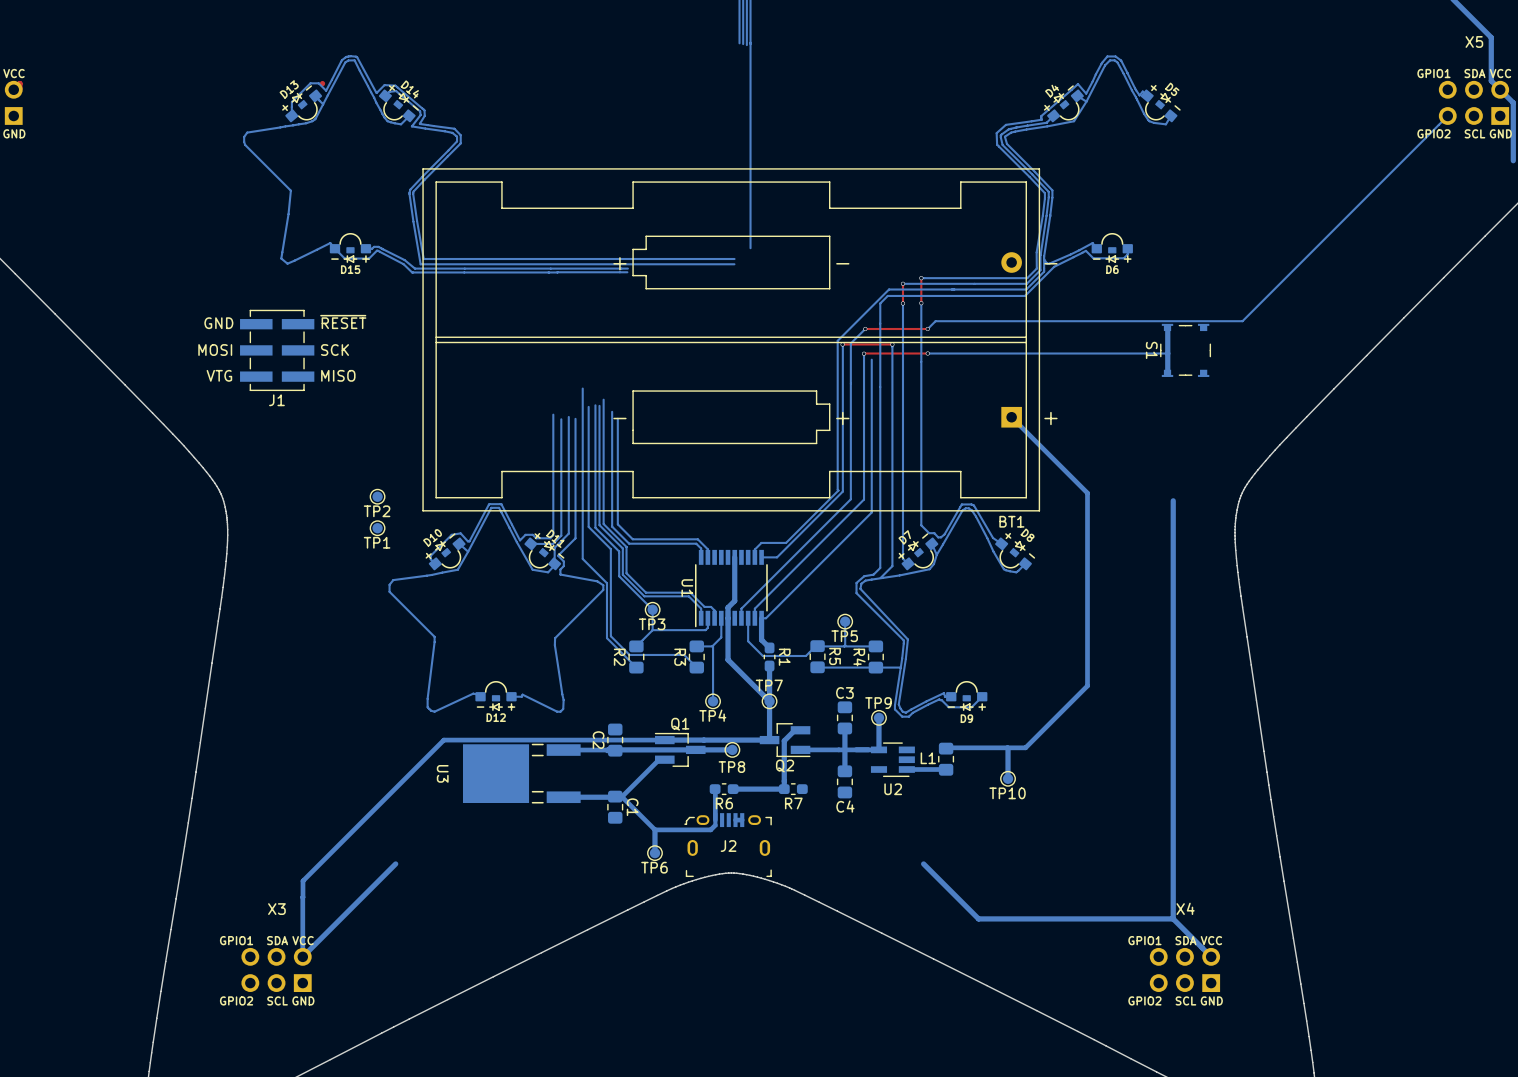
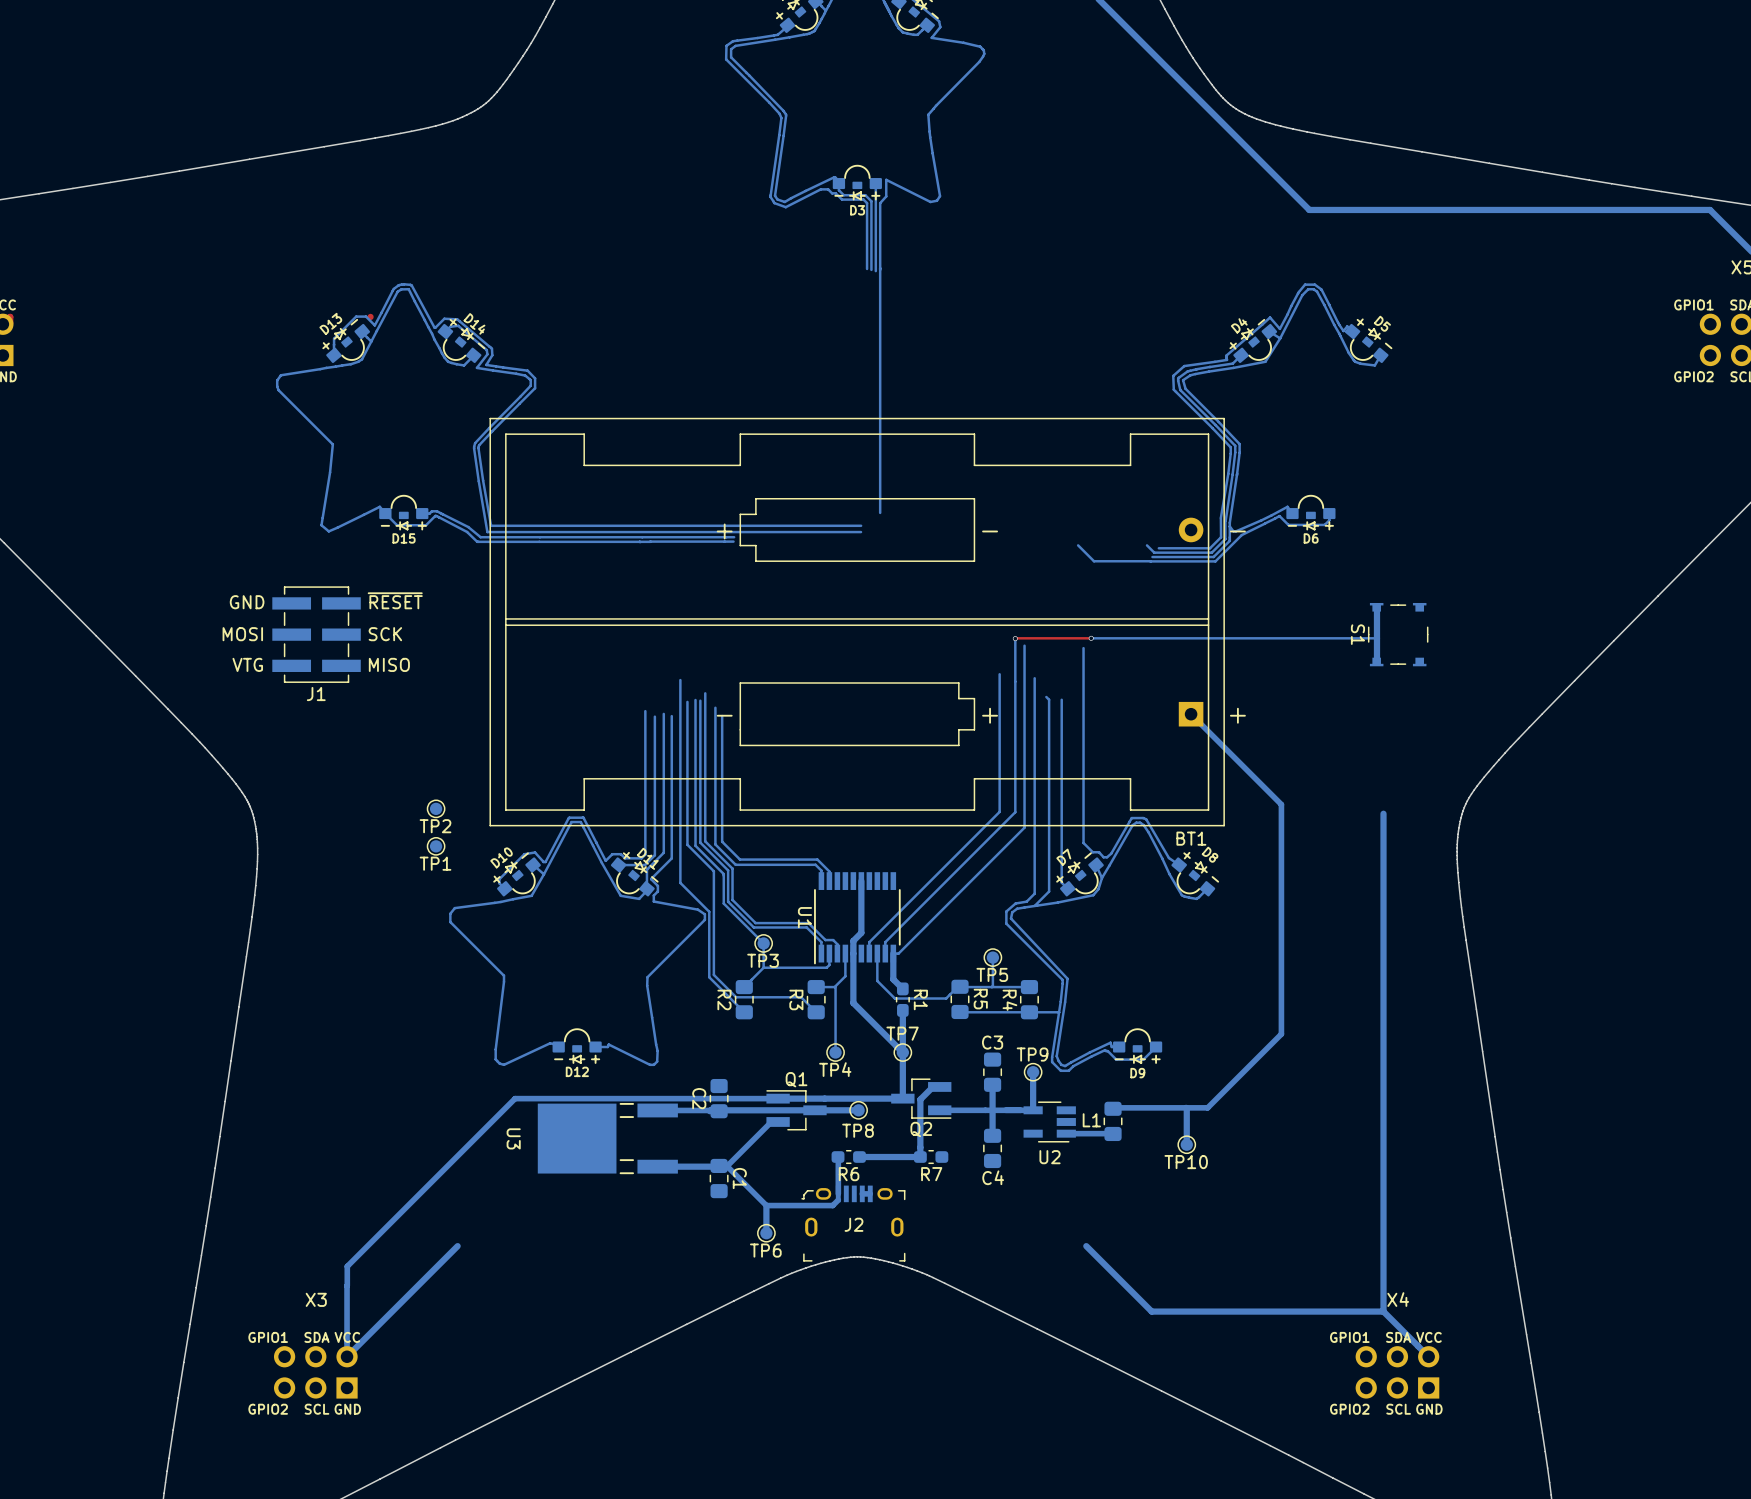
bottom track: (1447, 115) (1242, 321) (935, 321) (927, 328) -> none
bottom track: none -> (1078, 545) (1094, 561) (1150, 561)
bottom track: (1027, 277) (921, 277) -> (1210, 548) (1158, 548)
top track: (921, 278) (921, 303) -> none
via: (921, 278) -> none
bottom track: (1029, 281) (1026, 283) (902, 283) -> (1211, 552) (1154, 552) (1147, 545)
top track: (902, 283) (902, 303) -> none
via: (902, 283) -> none
bottom track: (1030, 285) (1026, 289) (889, 289) (837, 340) (838, 490) (786, 542) (761, 542) (754, 549) (754, 557) -> (1213, 557) (1152, 557)
bottom track: (1032, 288) (1025, 295) (887, 295) (880, 303) (880, 387) -> (1215, 561) (1150, 561)
bottom track: (902, 303) (902, 405) -> none
via: (902, 303) -> none
bottom track: (921, 303) (921, 361) -> none
via: (921, 303) -> none
bottom track: (865, 328) (850, 343) (850, 383) -> none
via: (865, 328) -> none
top track: (927, 328) (865, 328) -> none
via: (927, 328) -> none
bottom track: (842, 344) (842, 491) (777, 557) (761, 557) -> none
via: (842, 344) -> none
bottom track: (892, 344) (892, 405) -> (1046, 697) (1049, 699)
top track: (892, 344) (842, 344) -> none
via: (892, 344) -> none

